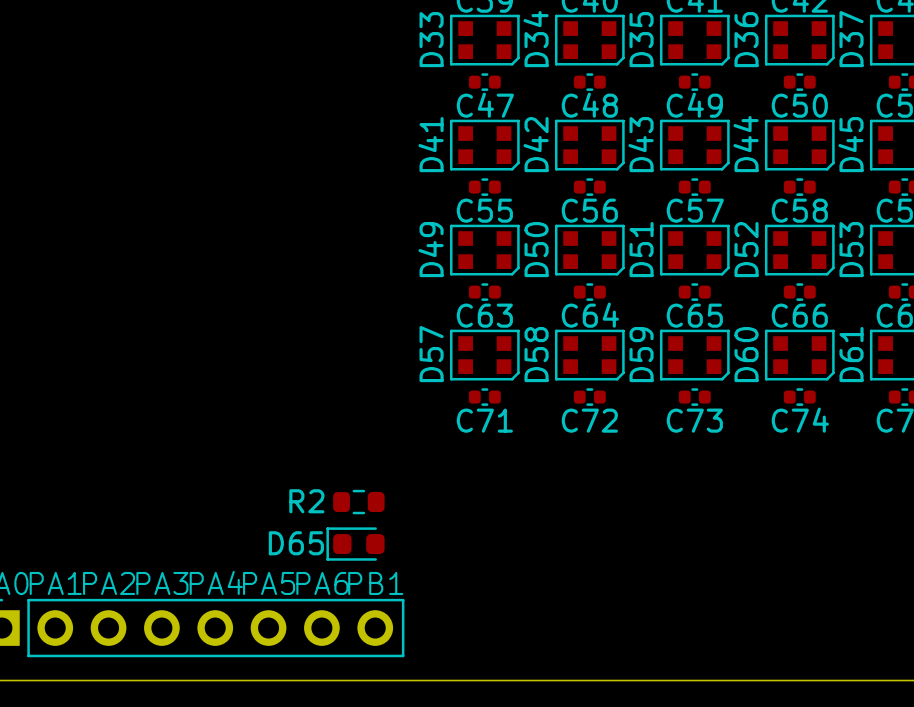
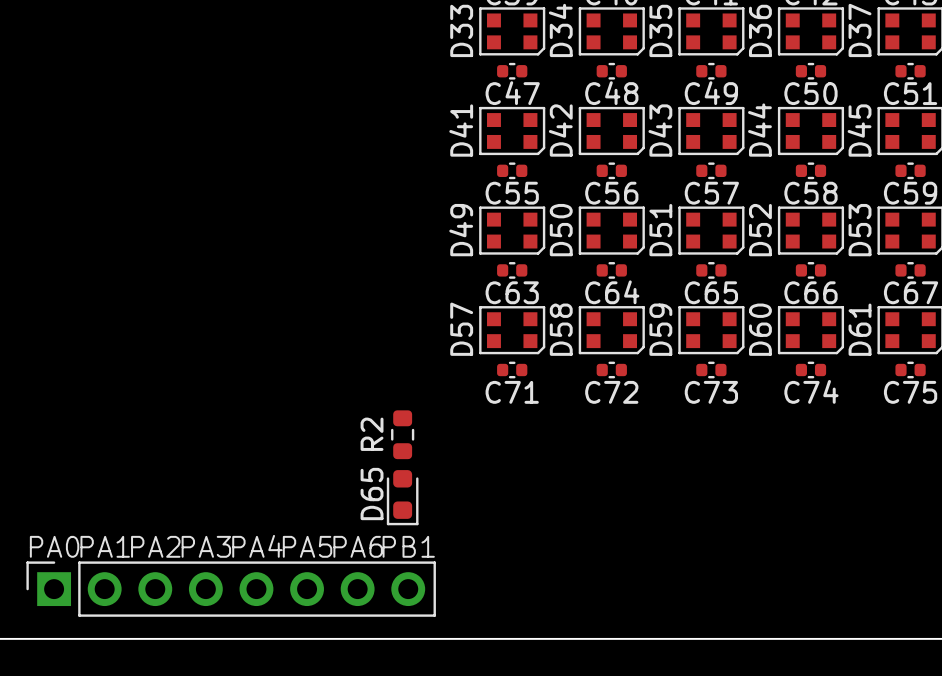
R2 rotation: 0° (358, 502) -> 90° clockwise (402, 434)
R2 position: (358, 502) -> (402, 434)
D65 rotation: 0° (355, 544) -> 90° counterclockwise (402, 497)

